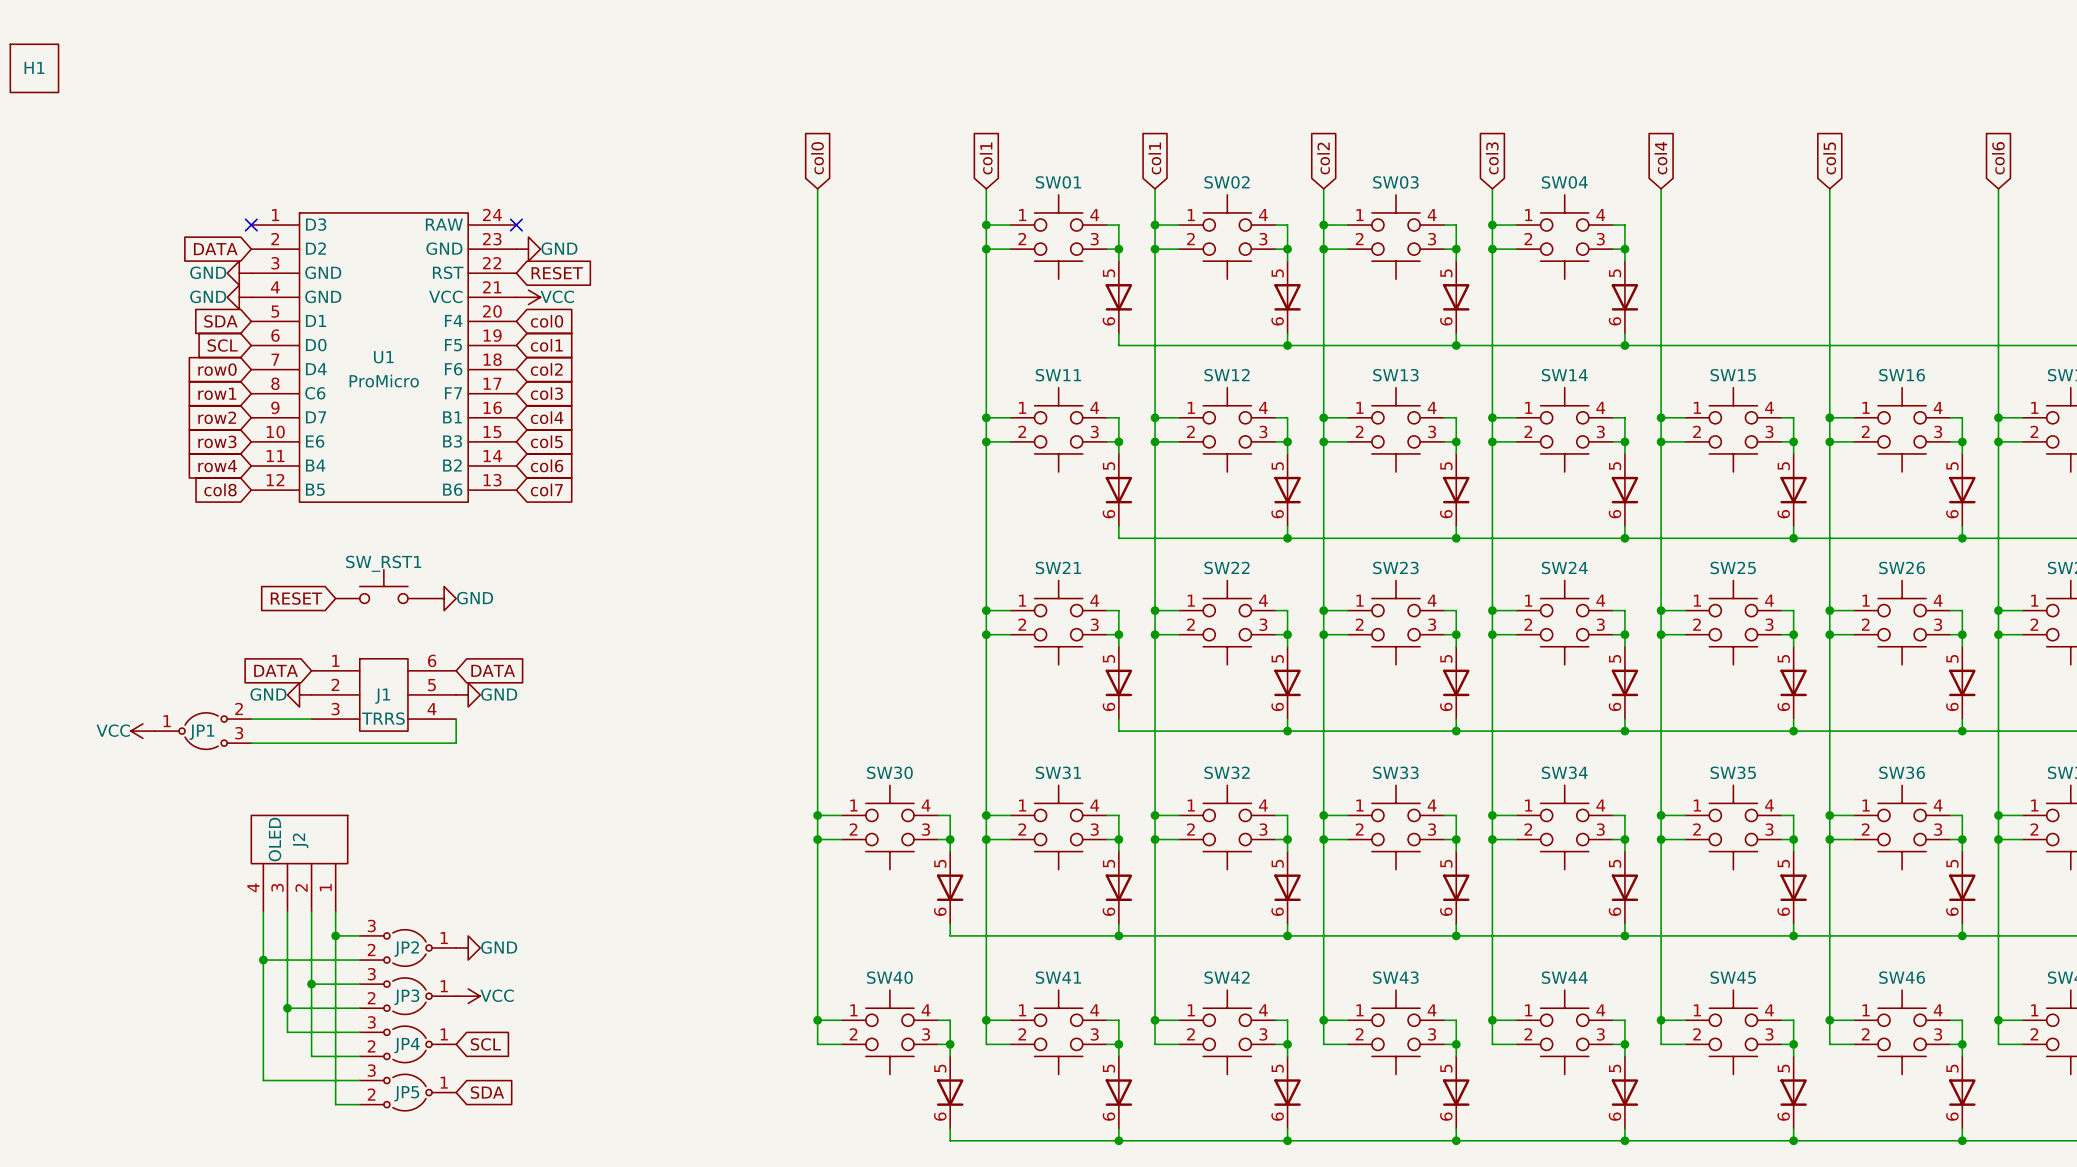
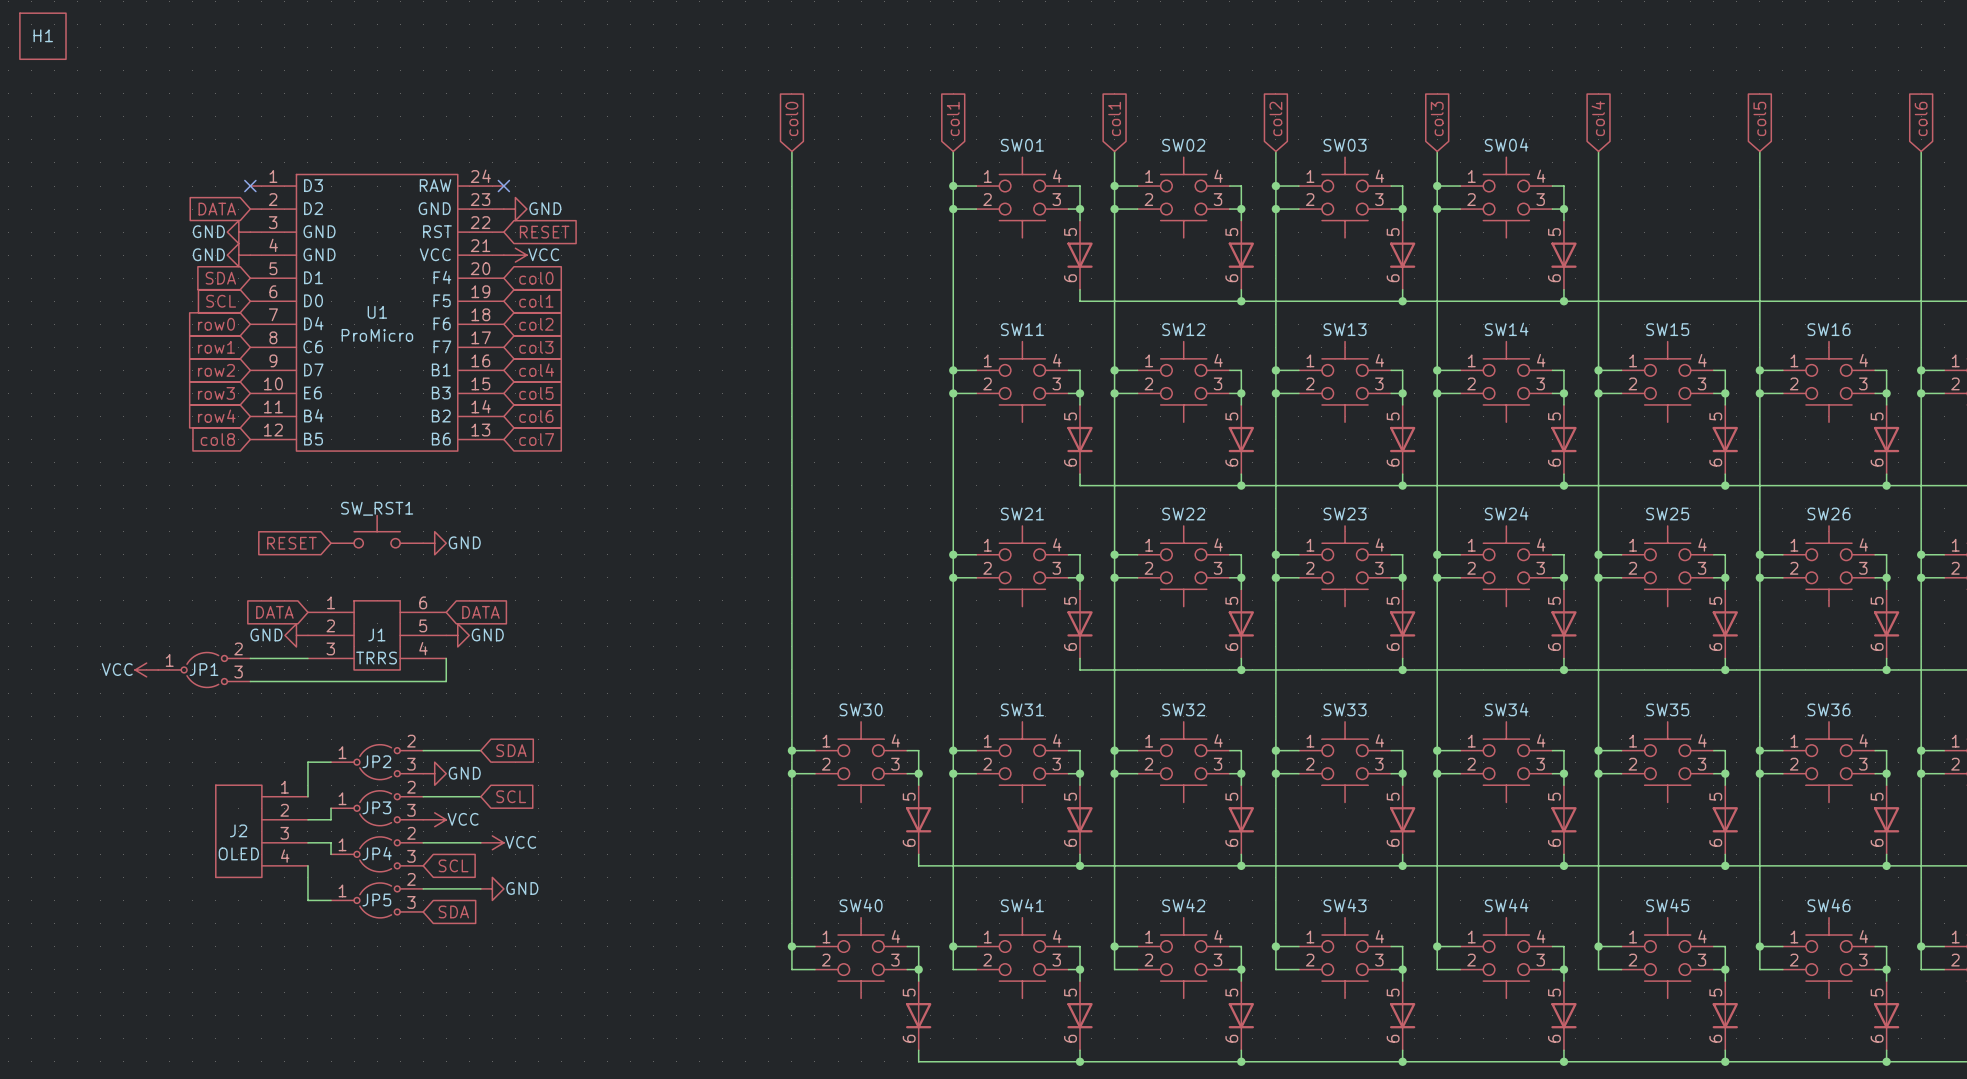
wire: none -> (423, 750) (480, 750)
global label: none -> SDA (511, 750)
wire: none -> (331, 762) (307, 762) (307, 796)
J2 rotation: 0° (299, 839) -> 90° counterclockwise (238, 831)
power symbol: none -> GND (434, 773)
wire: none -> (423, 796) (480, 796)
global label: none -> SCL (511, 796)
power symbol: none -> VCC (434, 819)
wire: (263, 911) (263, 1080) (359, 1080) -> none
wire: (287, 911) (287, 1032) (359, 1032) -> none
wire: (311, 911) (311, 935) -> (307, 842) (331, 842)
wire: none -> (423, 842) (480, 842)
power symbol: none -> VCC (492, 842)
wire: (335, 923) (335, 1104) (359, 1104) -> none
wire: (335, 935) (359, 935) -> none
junction: (335, 935) -> none
global label: none -> SCL (453, 865)
JP2 rotation: 0° (407, 947) -> 180° (377, 762)
JP2 position: (407, 947) -> (377, 762)
power symbol position: GND (468, 947) -> GND (492, 888)
wire: (263, 960) (359, 960) -> none
junction: (263, 960) -> none
wire: none -> (423, 888) (480, 888)
wire: (311, 972) (311, 1056) (359, 1056) -> (307, 900) (331, 900)
wire: (311, 984) (359, 984) -> none
junction: (311, 984) -> none
JP3 rotation: 0° (407, 996) -> 180° (377, 808)
JP3 position: (407, 996) -> (377, 808)
power symbol: VCC (468, 996) -> none
wire: (287, 1008) (359, 1008) -> none
junction: (287, 1008) -> none
JP4 rotation: 0° (407, 1044) -> 180° (377, 854)
JP4 position: (407, 1044) -> (377, 854)
global label: SCL (485, 1044) -> none
JP5 rotation: 0° (407, 1092) -> 180° (377, 900)
JP5 position: (407, 1092) -> (377, 900)
global label position: SDA (487, 1092) -> SDA (453, 911)

